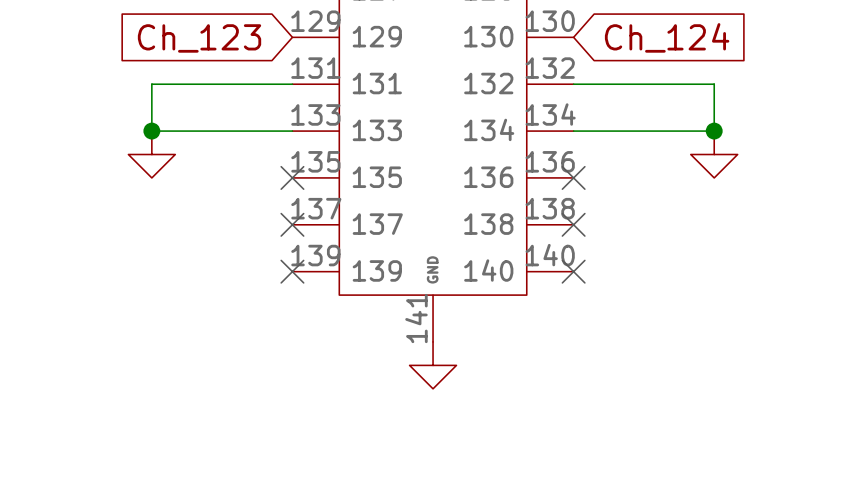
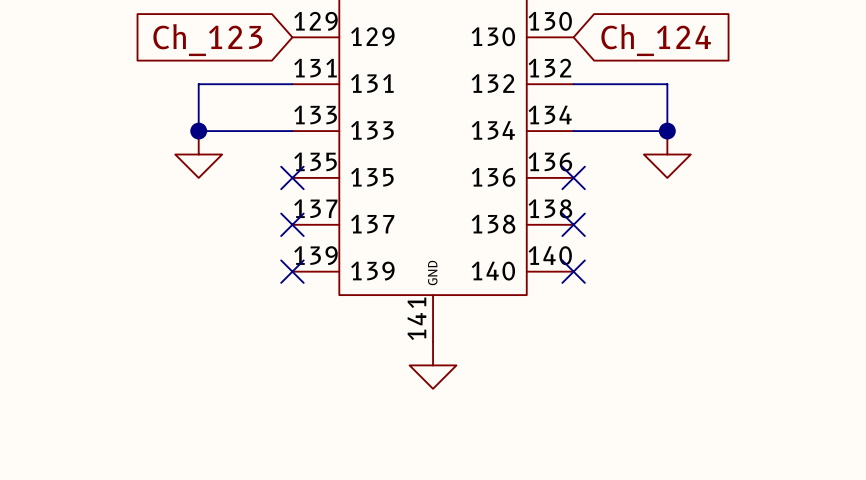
wire: (198, 84) (151, 84) (151, 131) (198, 131) -> (198, 84) (198, 131)
wire: (667, 84) (714, 84) (714, 131) (667, 131) -> (667, 84) (667, 131)
junction position: (151, 131) -> (198, 131)
junction position: (714, 131) -> (667, 131)
power symbol position: (151, 154) -> (198, 154)
power symbol position: (714, 154) -> (667, 154)

